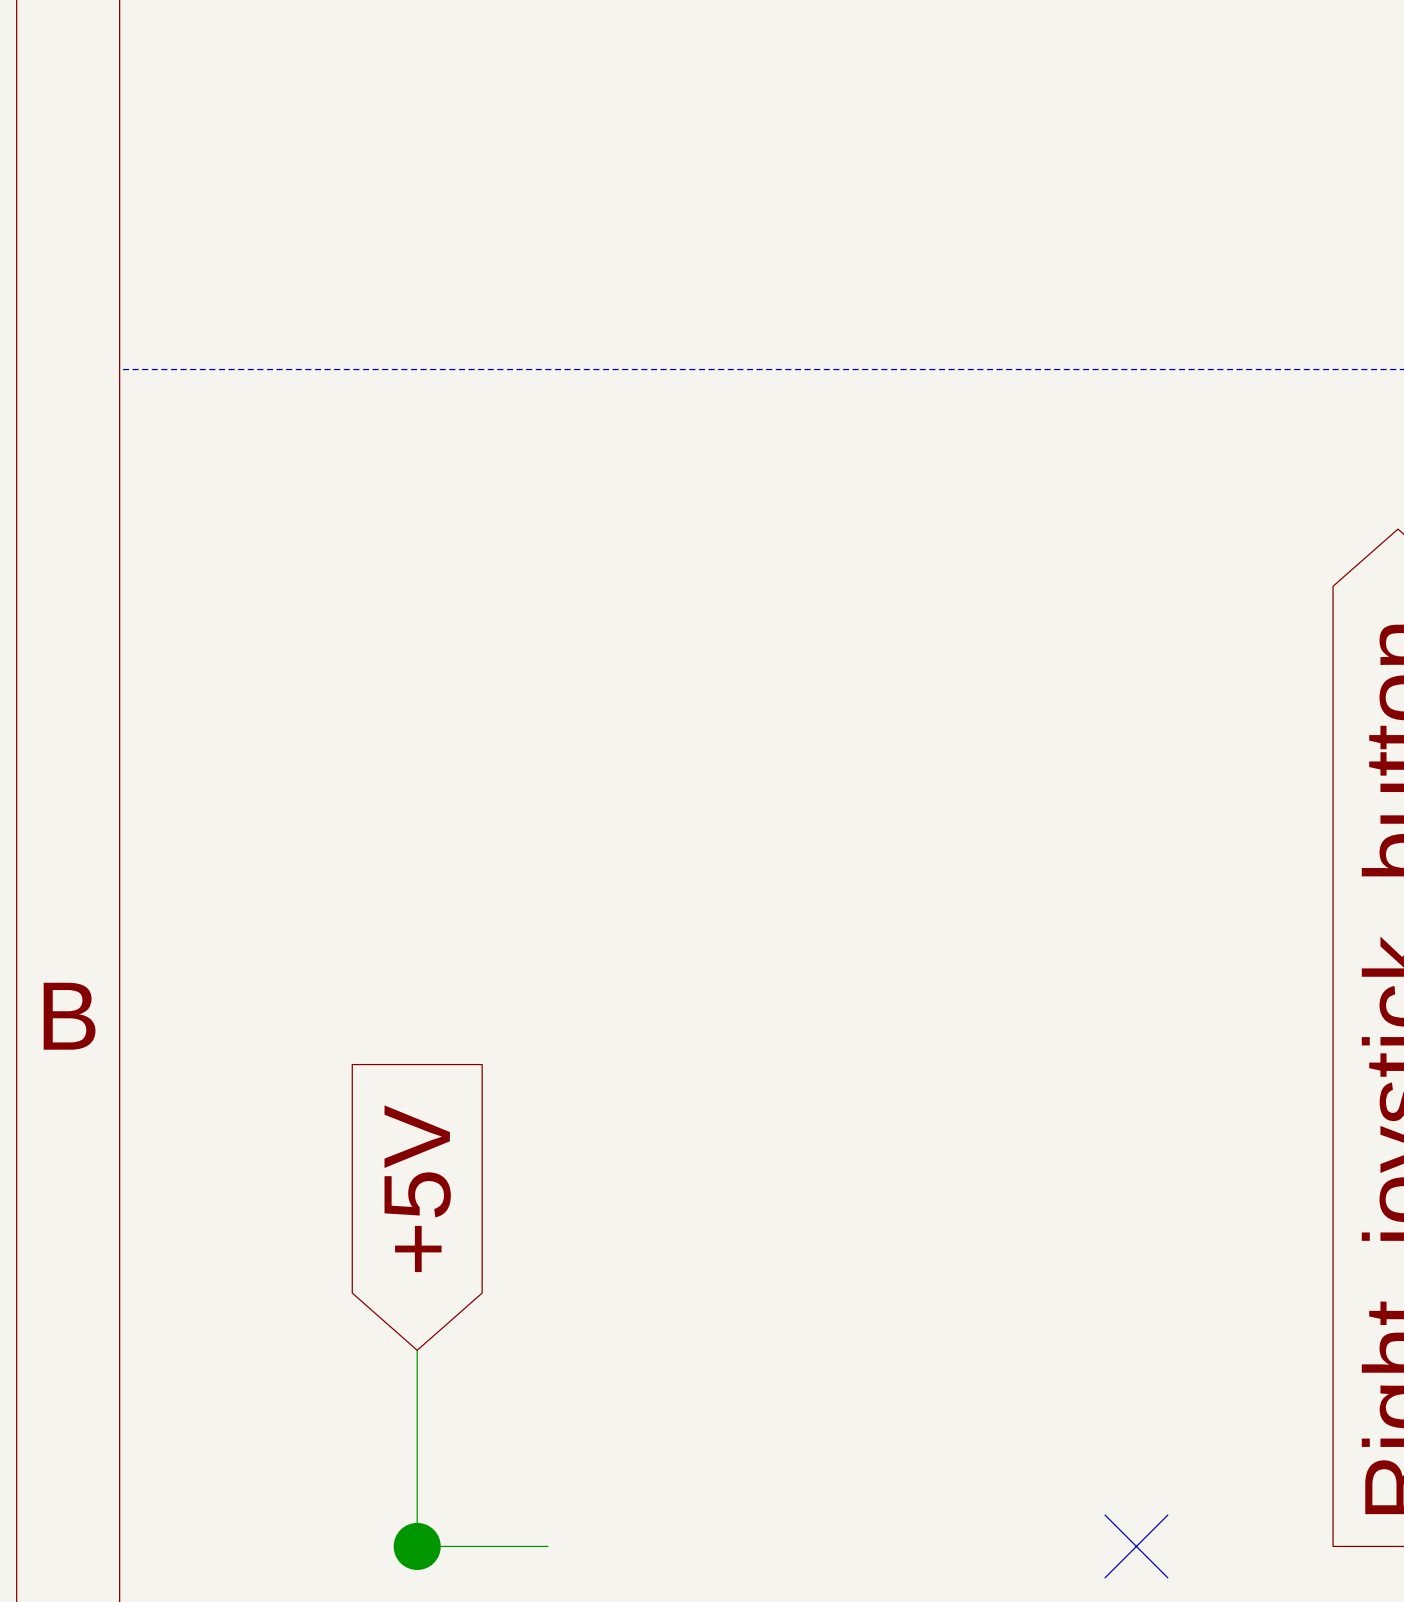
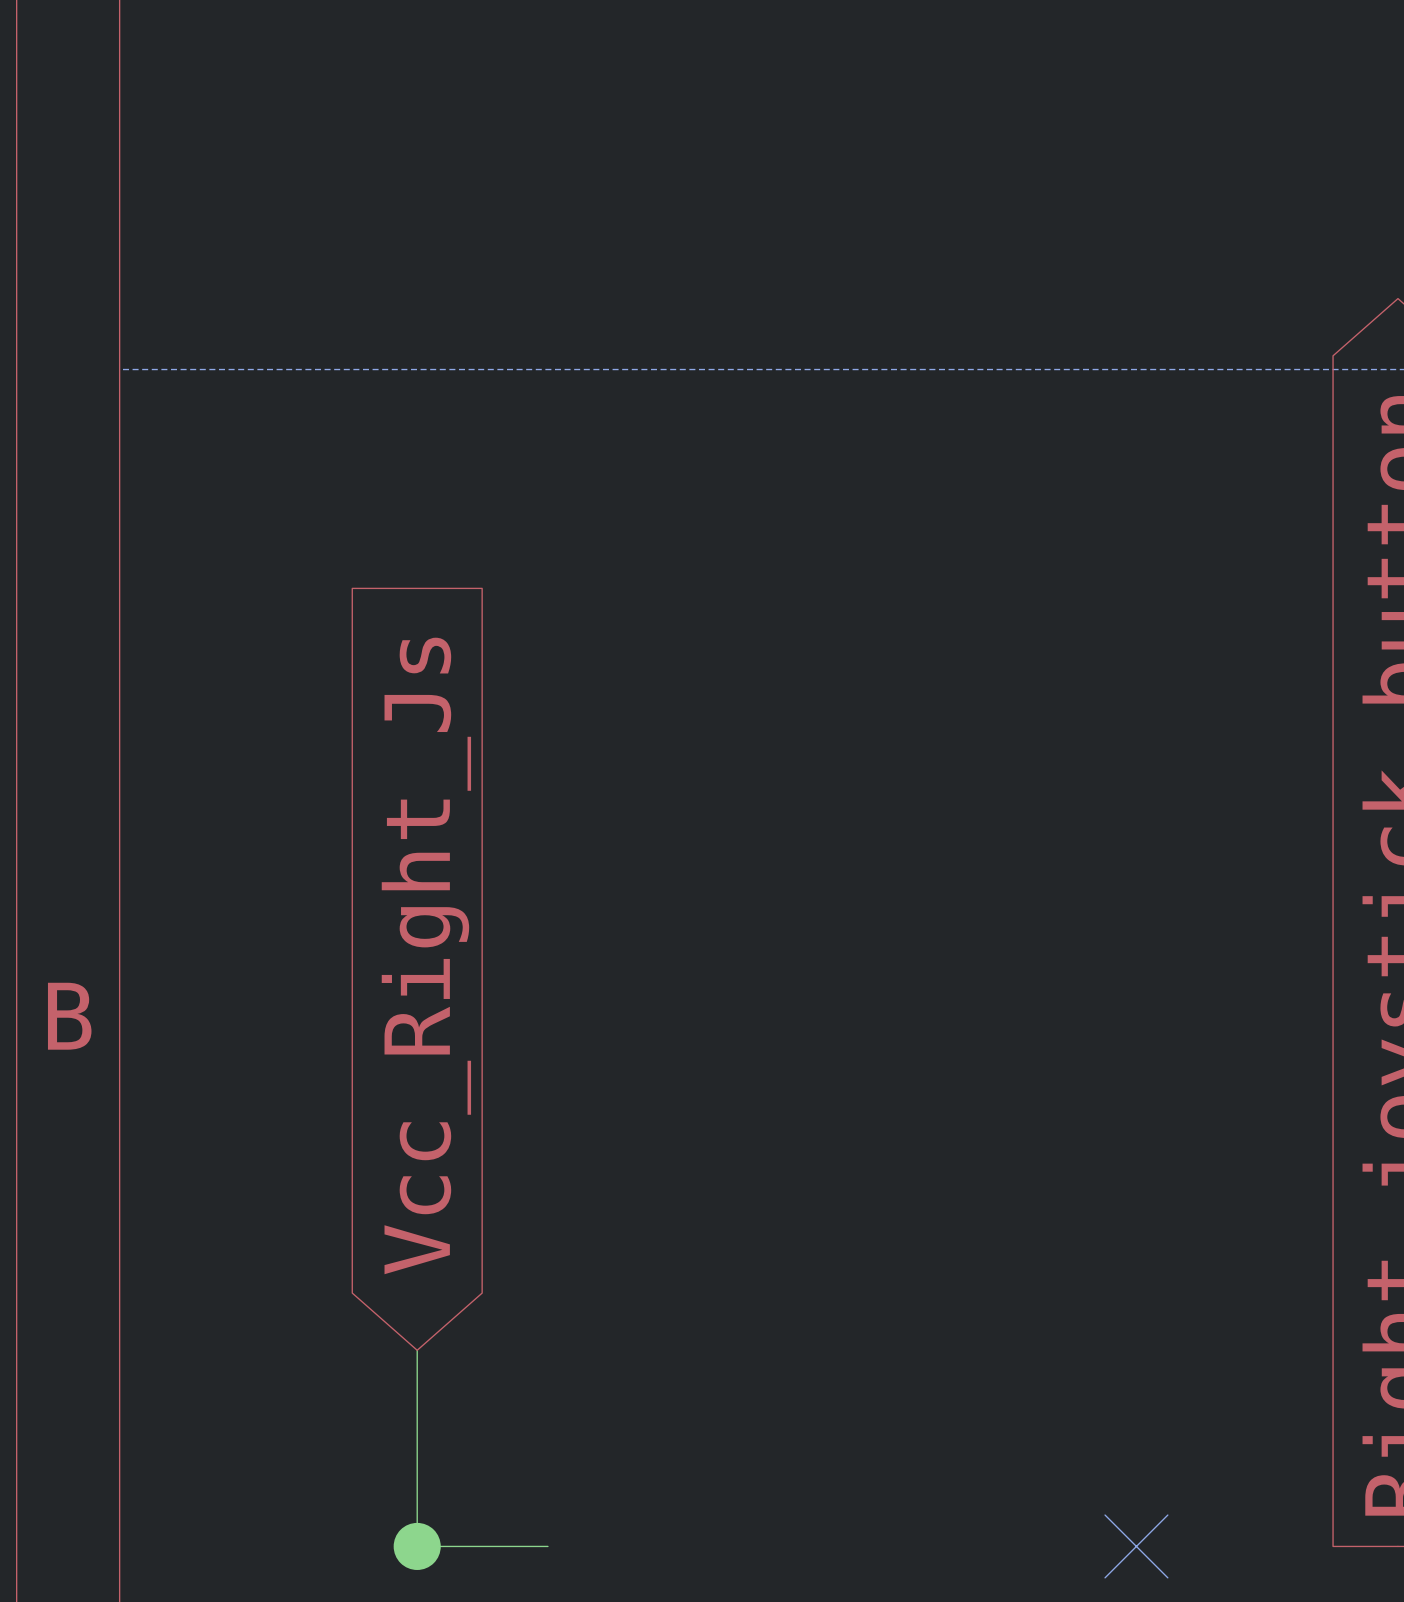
global label: +5V (417, 1188) -> Vcc_Right_Js (426, 955)

